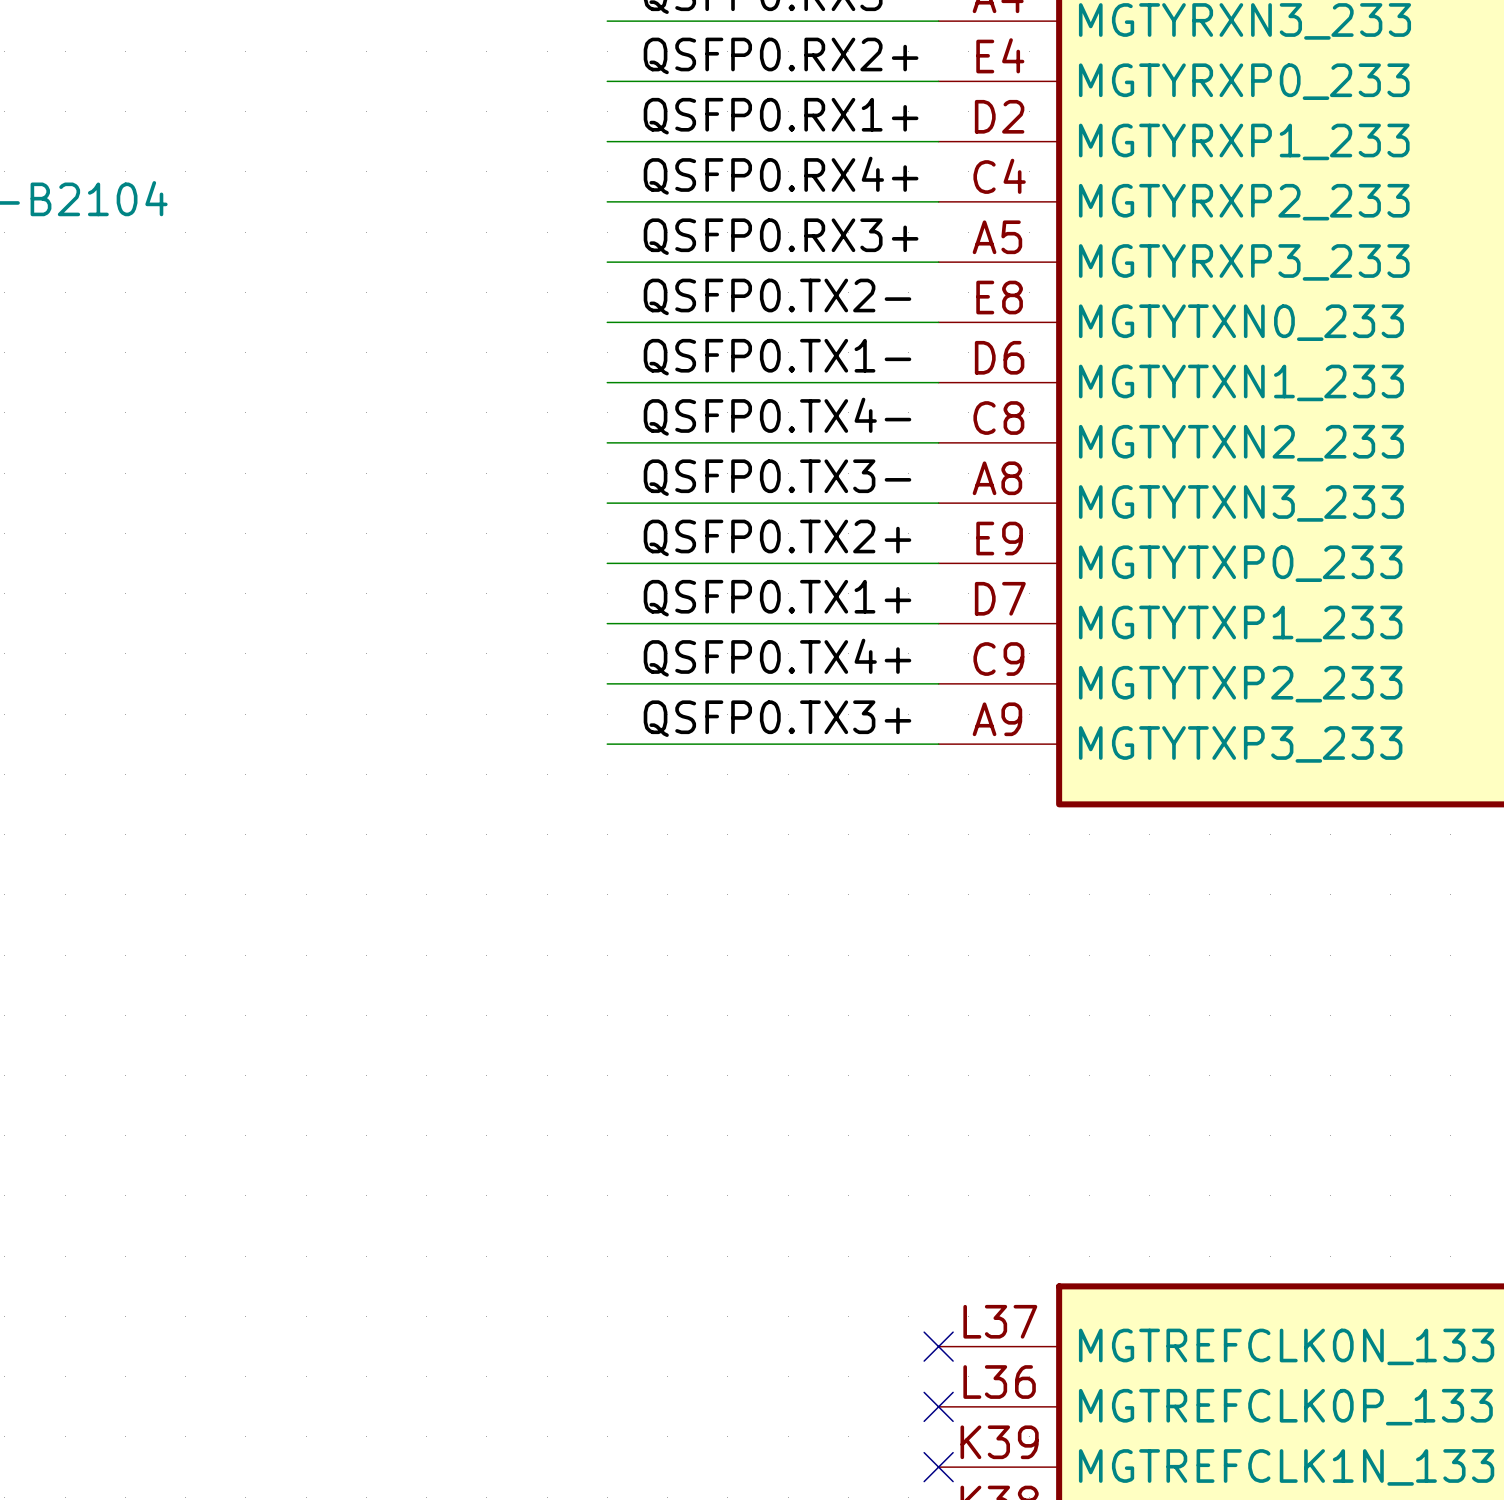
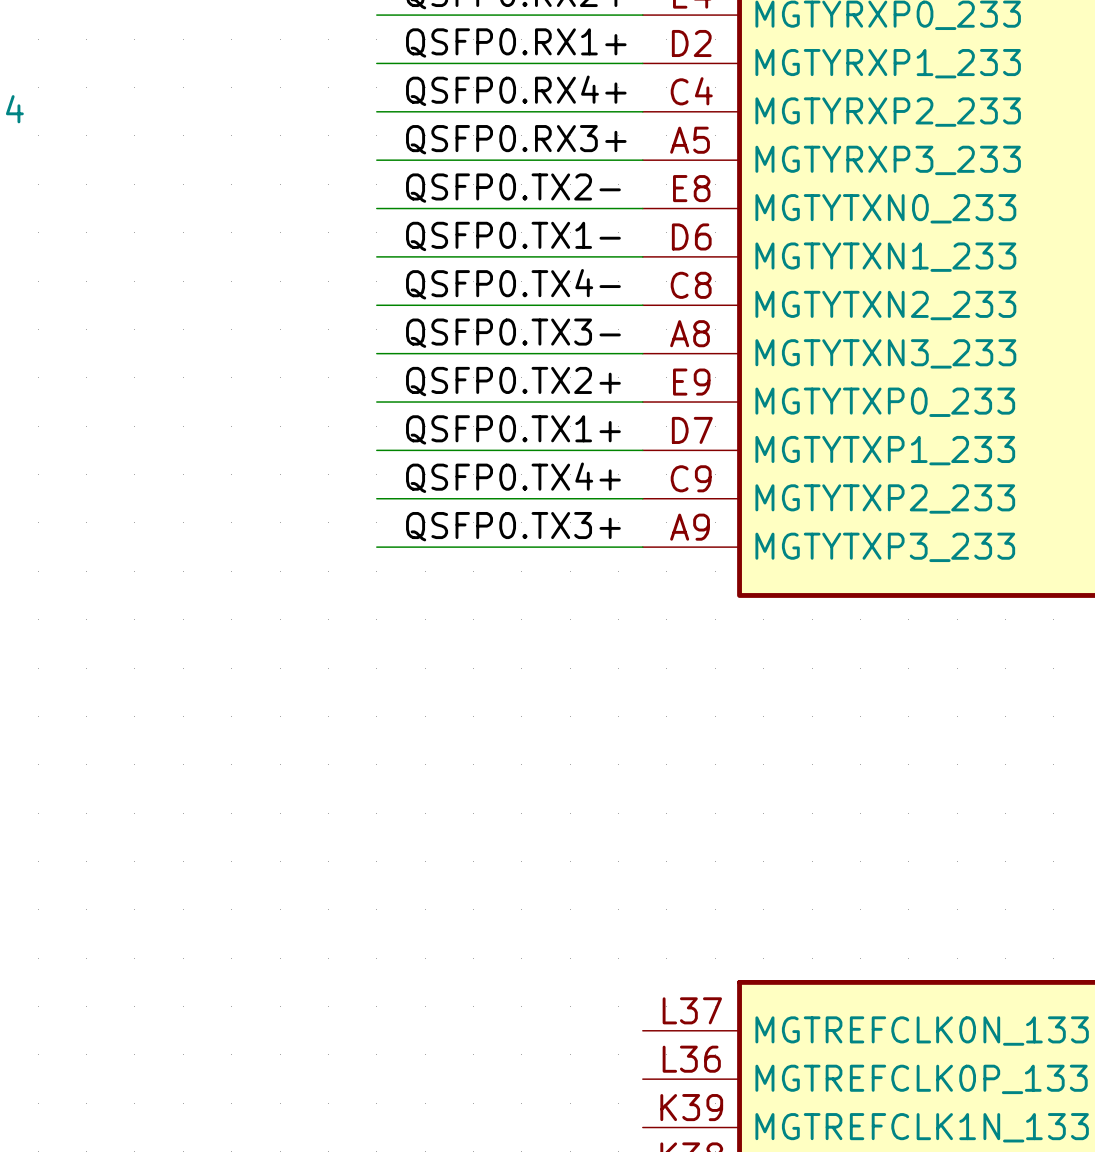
no-connect mark: (938, 1346) -> none
no-connect mark: (938, 1406) -> none
no-connect mark: (938, 1467) -> none

